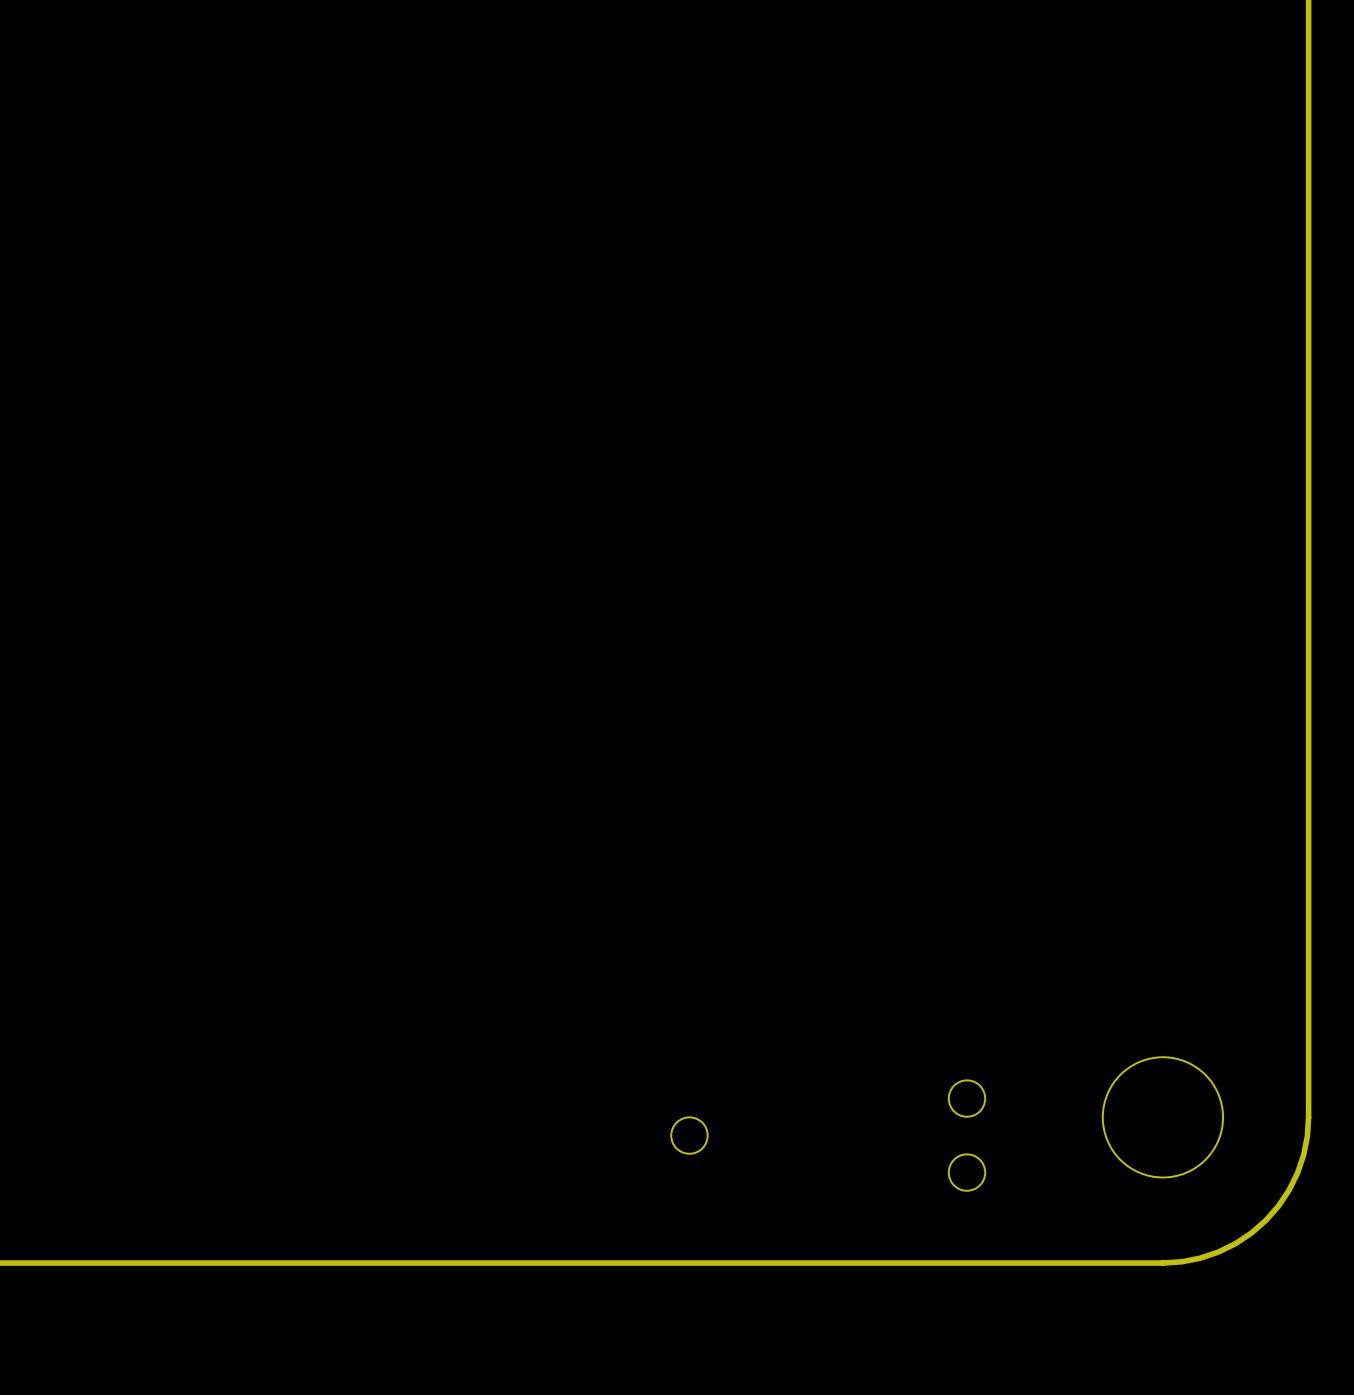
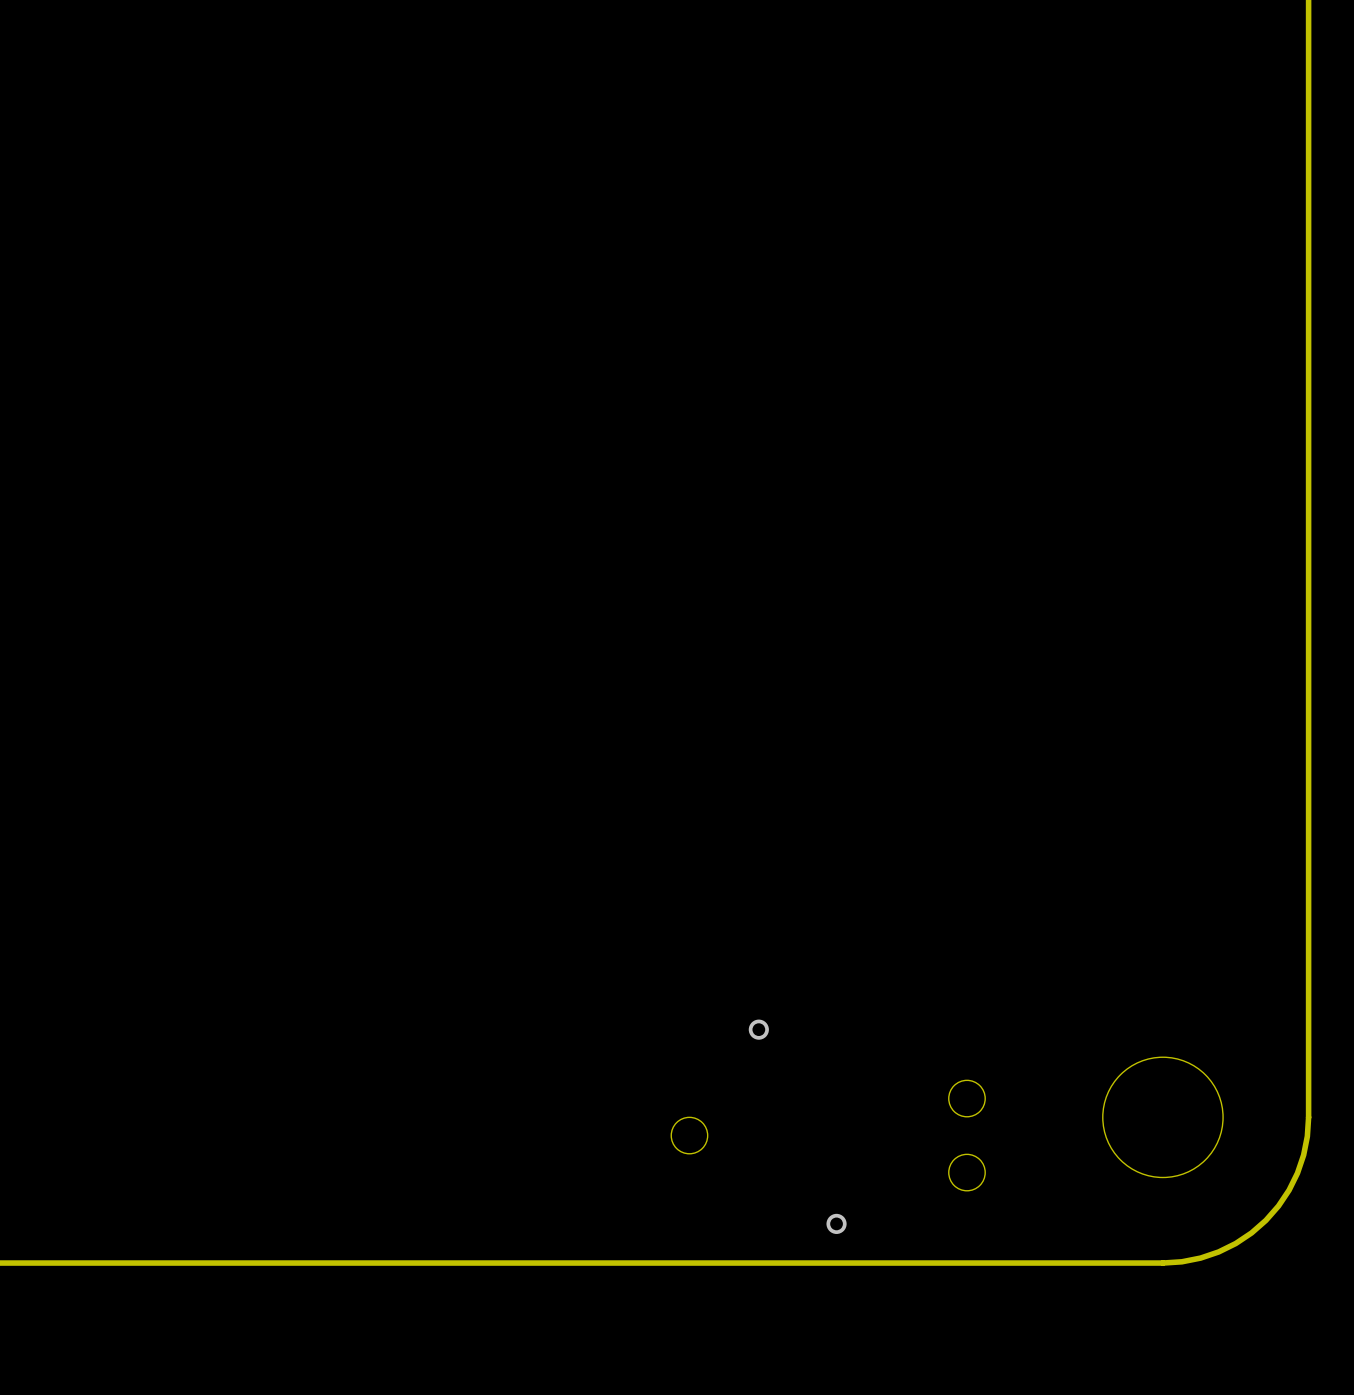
via: none -> (758, 1029)
via: none -> (836, 1223)

